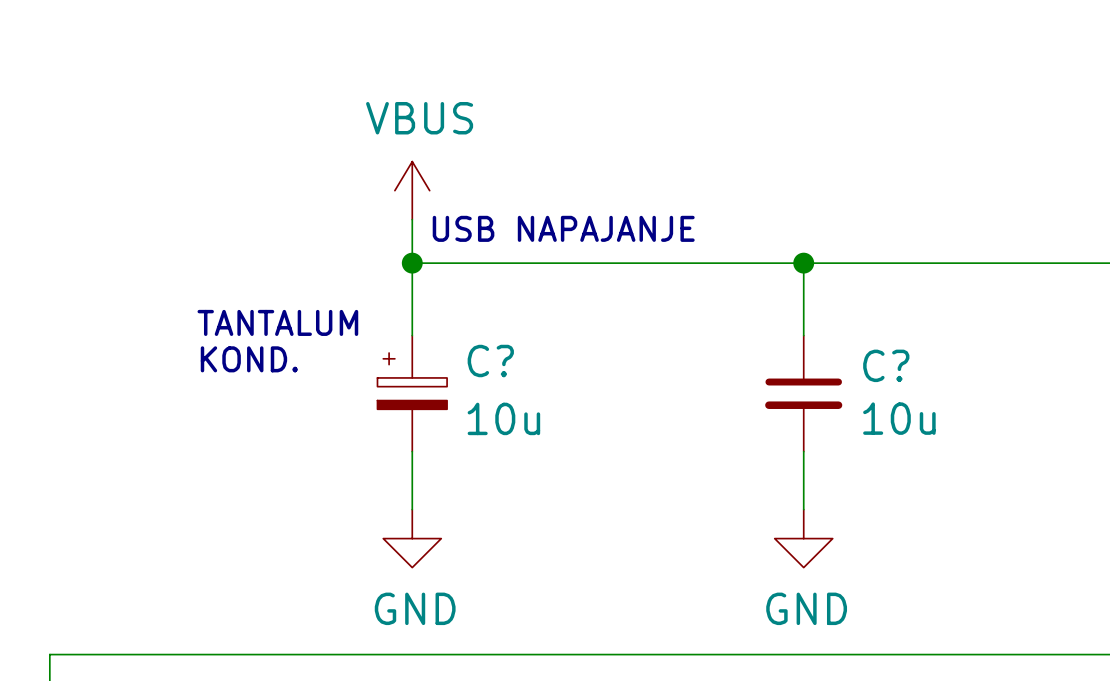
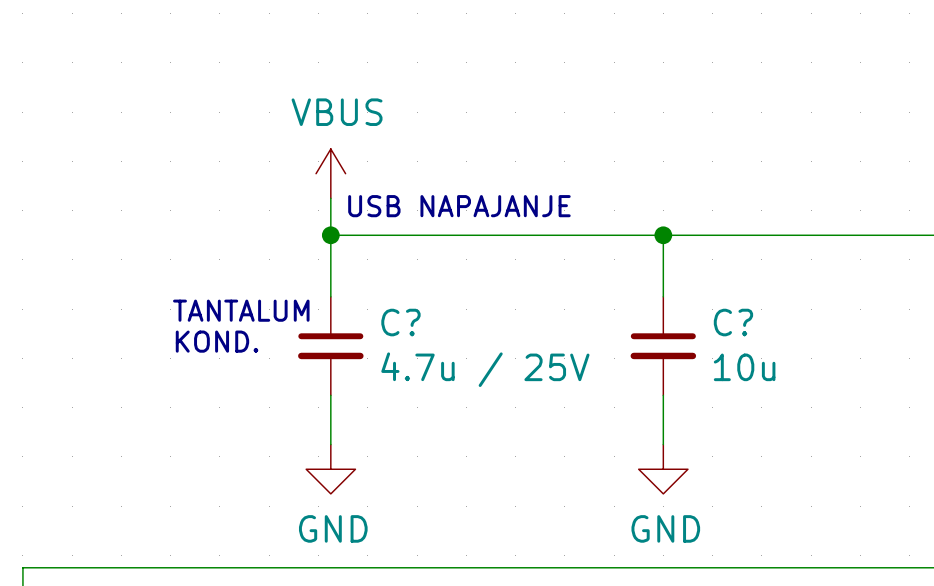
text position: TANTALUM (277, 322) -> TANTALUM (241, 310)
C? symbol: [377, 335, 448, 452] -> [298, 296, 364, 396]
text position: KOND. (249, 359) -> KOND. (217, 341)
C? value: 10u (503, 418) -> 4.7u / 25V (485, 369)

